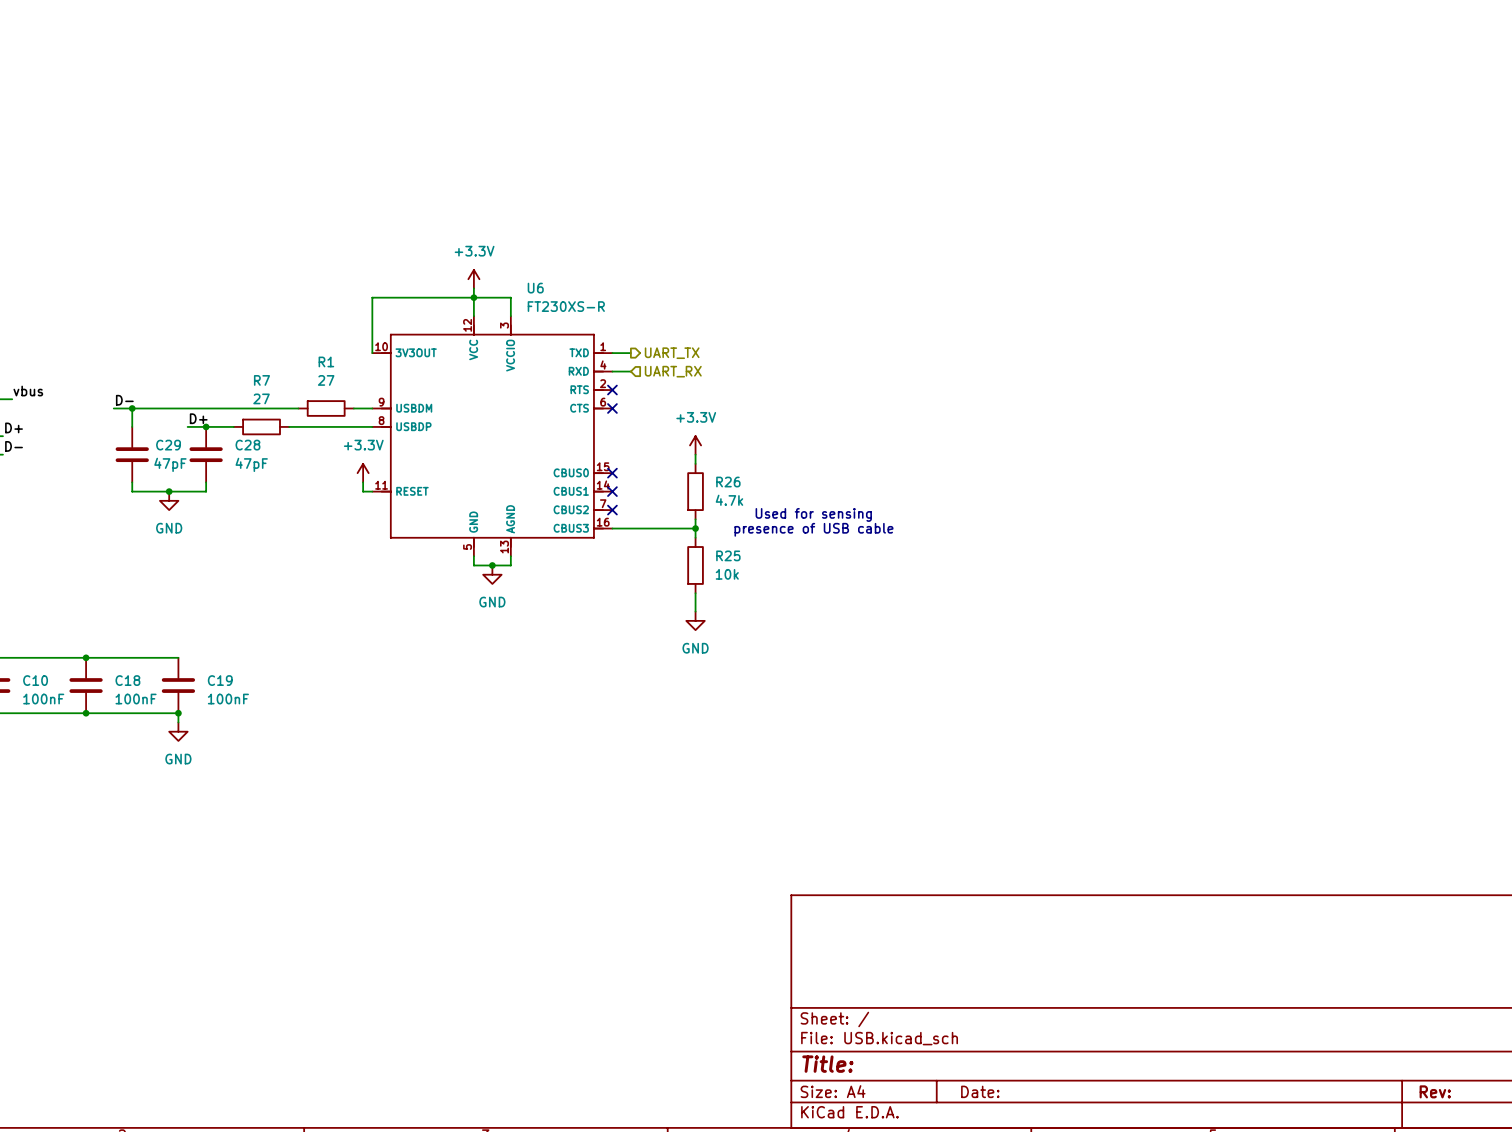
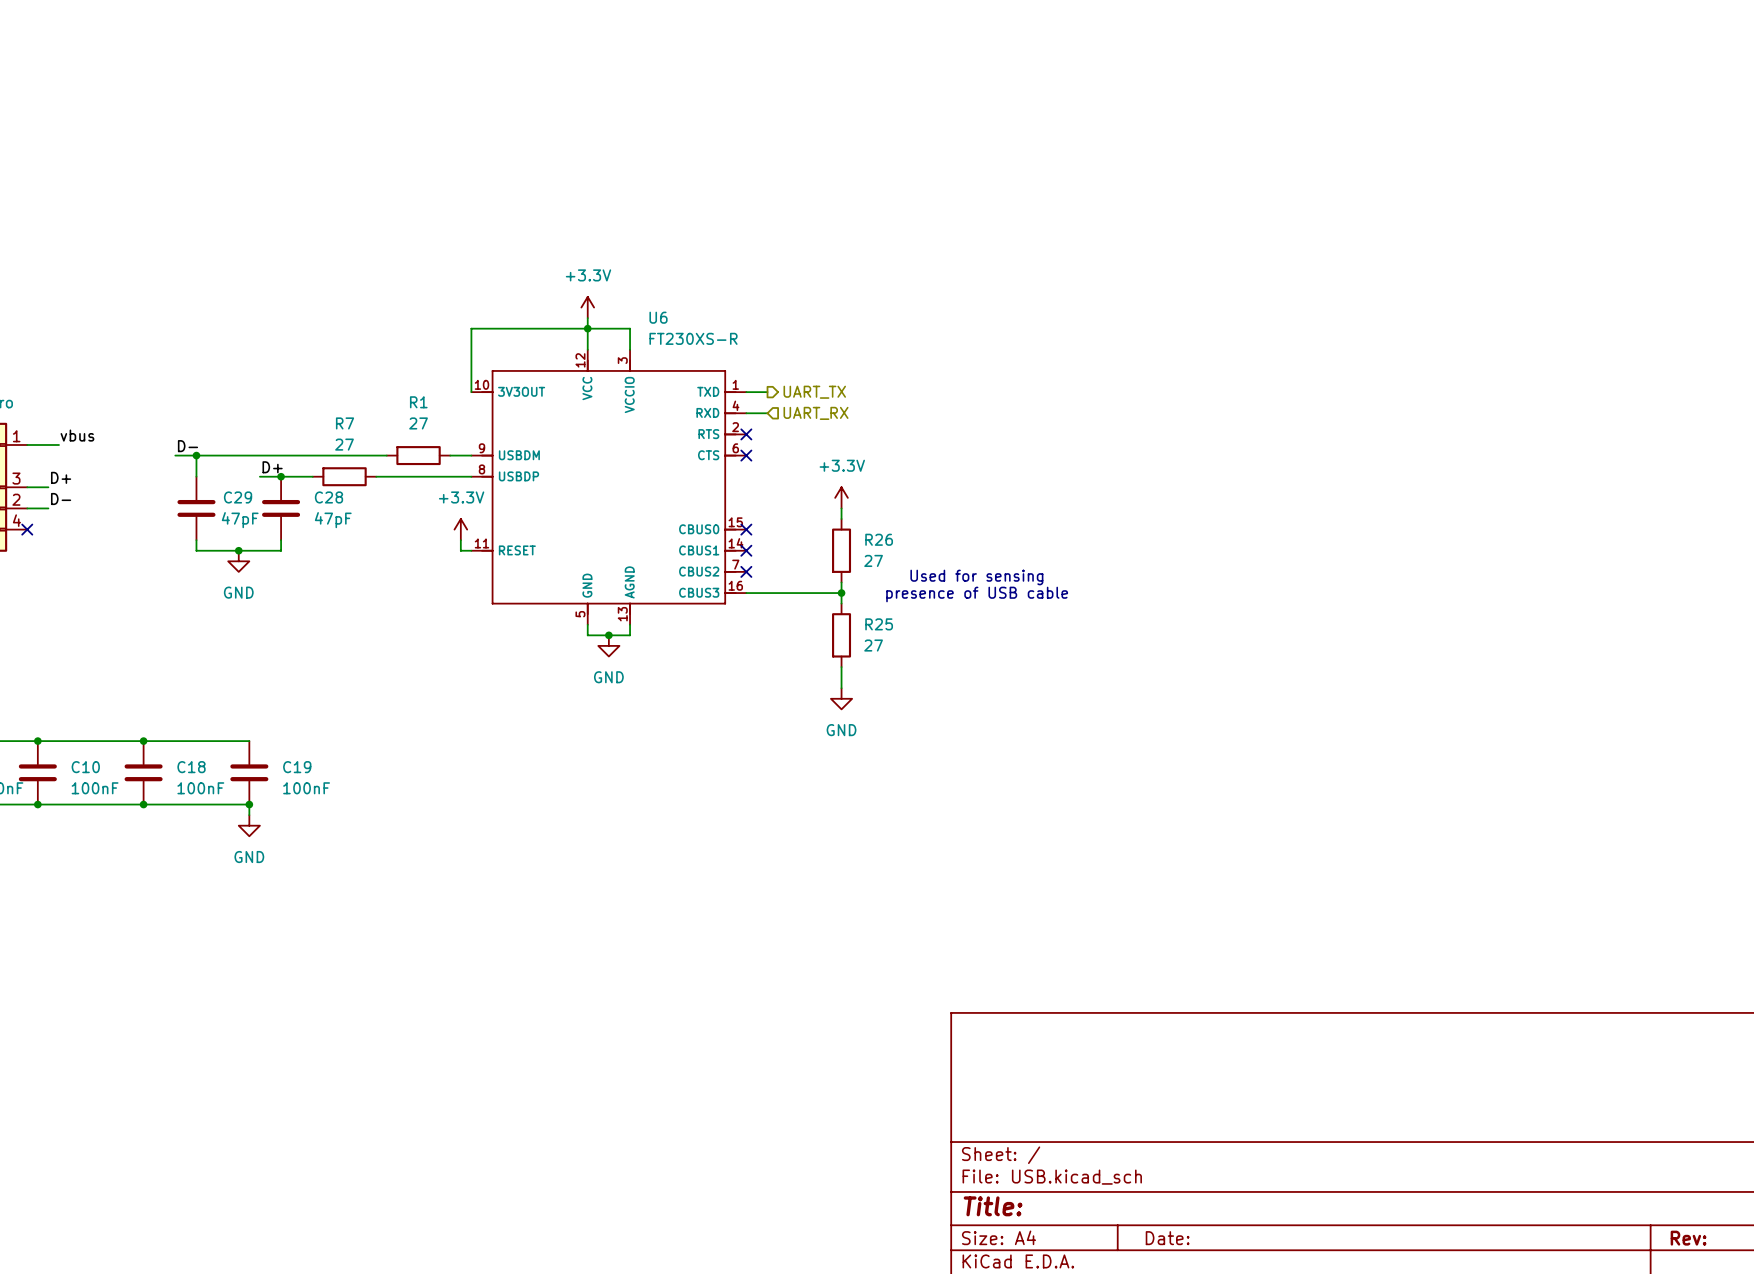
R26 value: 4.7k (729, 500) -> 27 (873, 560)
R25 value: 10k (727, 574) -> 27 (873, 645)

